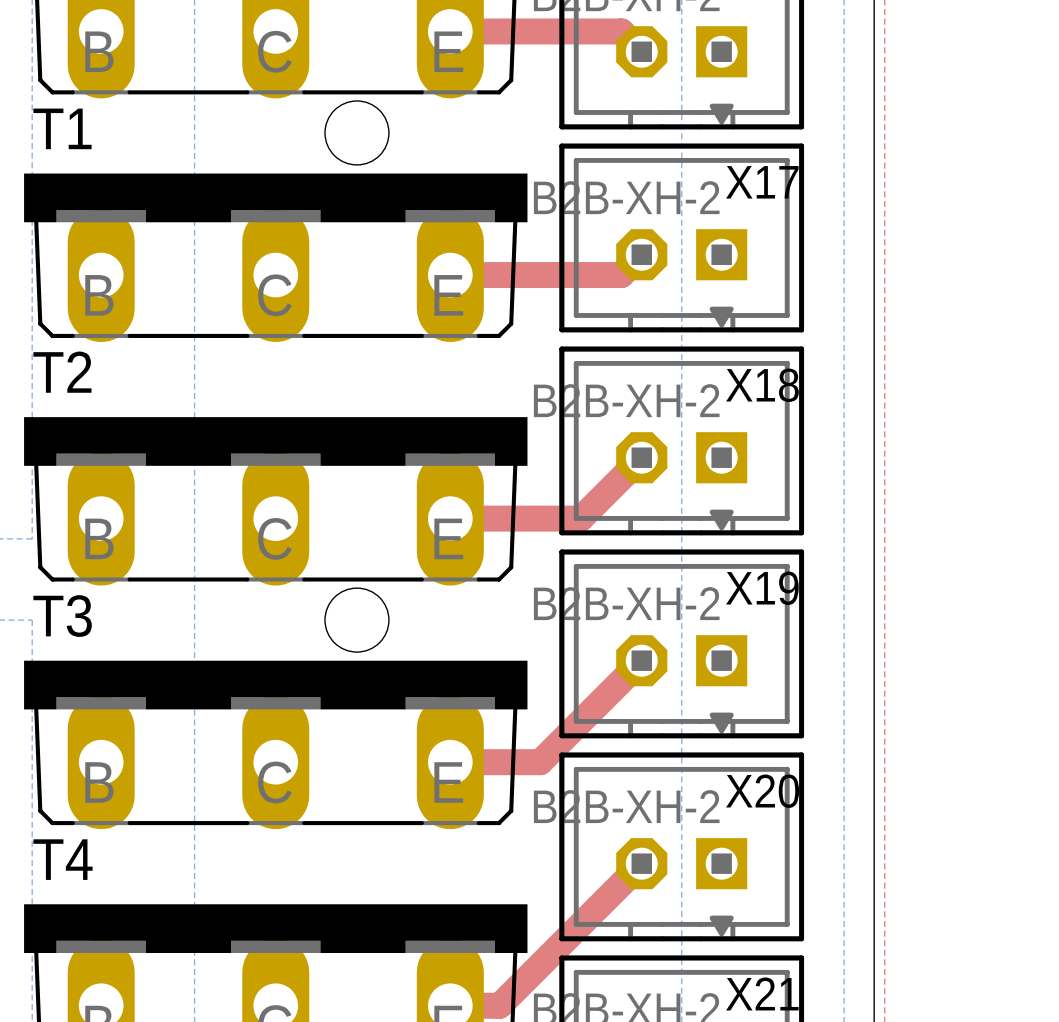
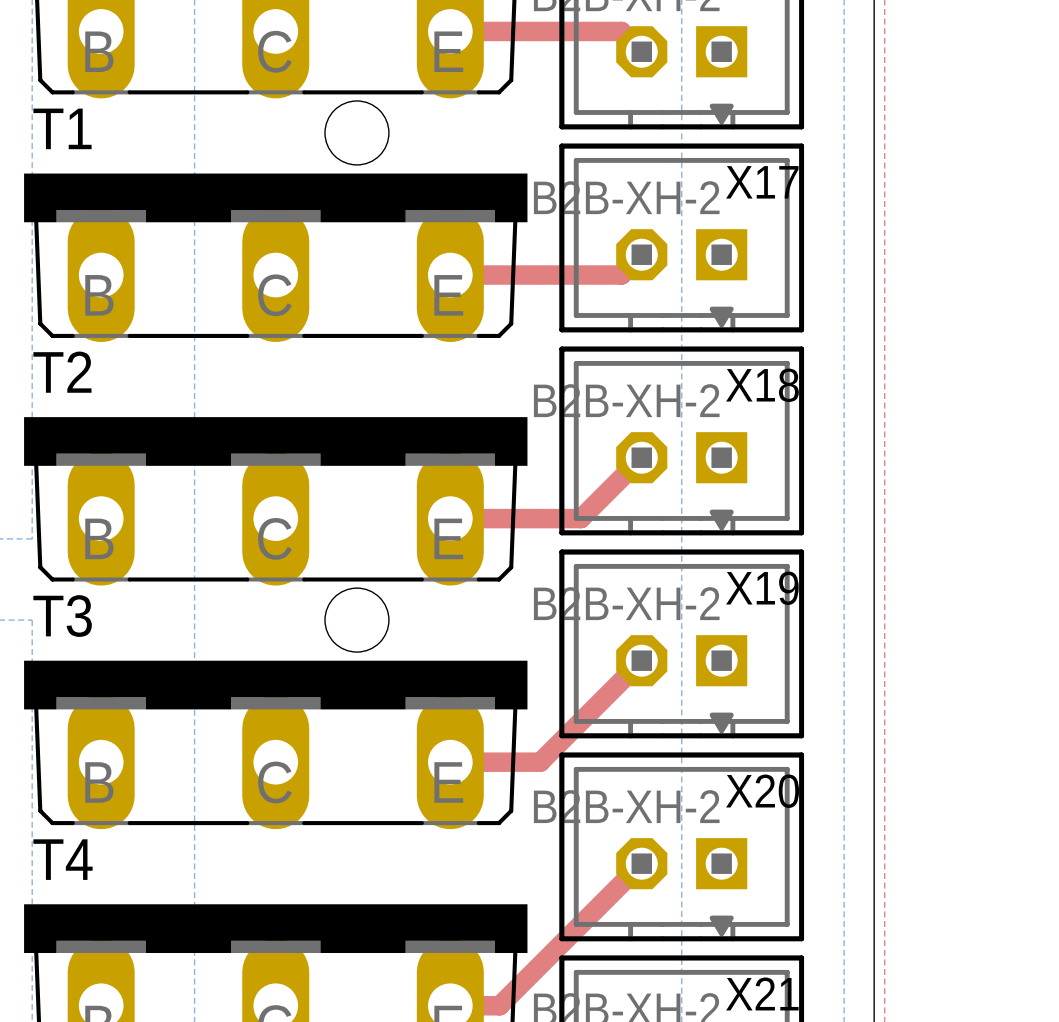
top track width: thick (450, 31) (621, 31) (641, 51) -> thin (450, 31) (621, 31) (641, 51)
top track width: thick (641, 254) (621, 275) (450, 275) -> thin (641, 254) (621, 275) (450, 275)
top track width: thick (641, 457) (580, 518) (450, 518) -> thin (641, 457) (580, 518) (450, 518)
top track width: thick (641, 660) (540, 762) (450, 762) -> thin (641, 660) (540, 762) (450, 762)
top track width: thick (641, 863) (499, 1005) (450, 1005) -> thin (641, 863) (499, 1005) (450, 1005)

